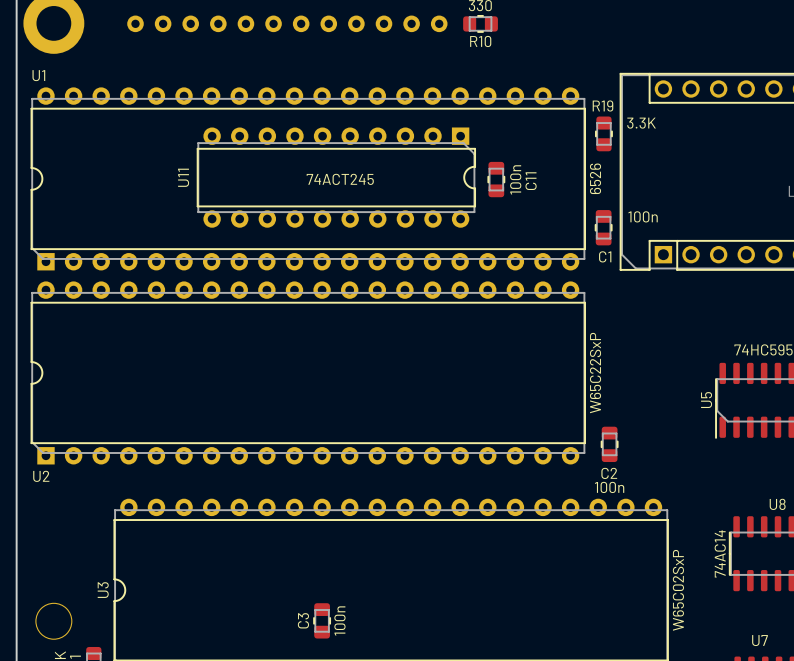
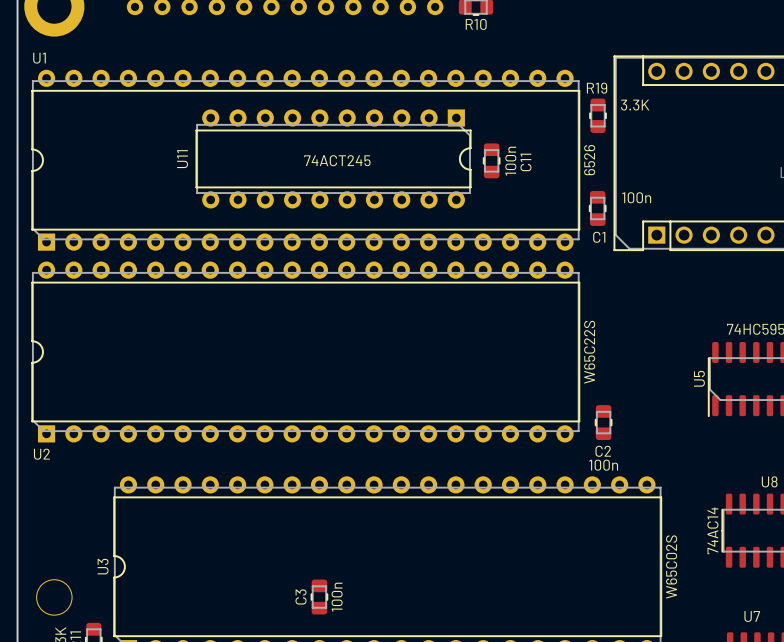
U2 value: W65C22SxP (595, 373) -> W65C22S (589, 352)
U3 value: W65C02SxP (678, 590) -> W65C02S (671, 566)

